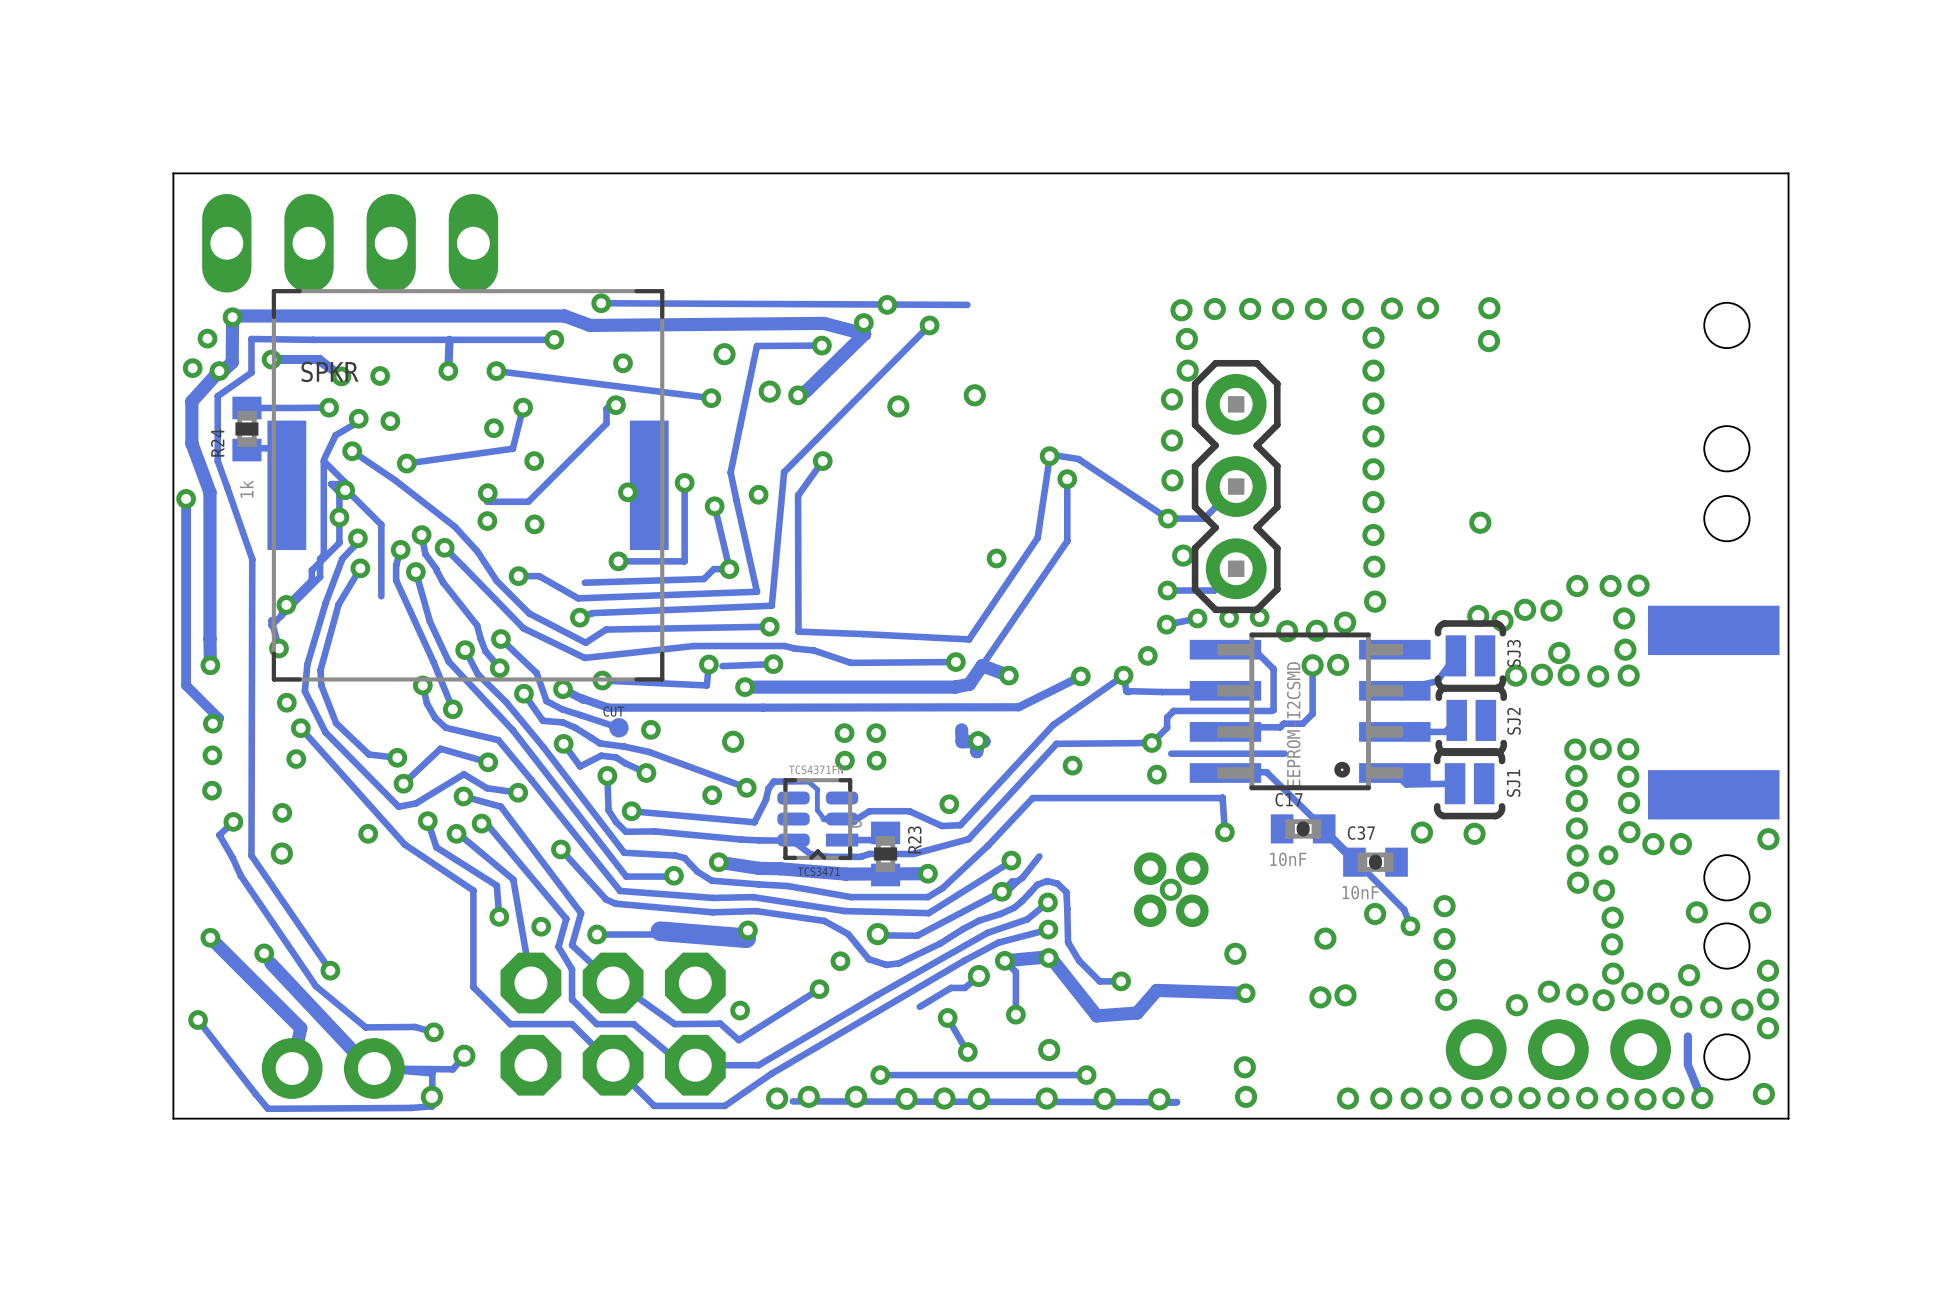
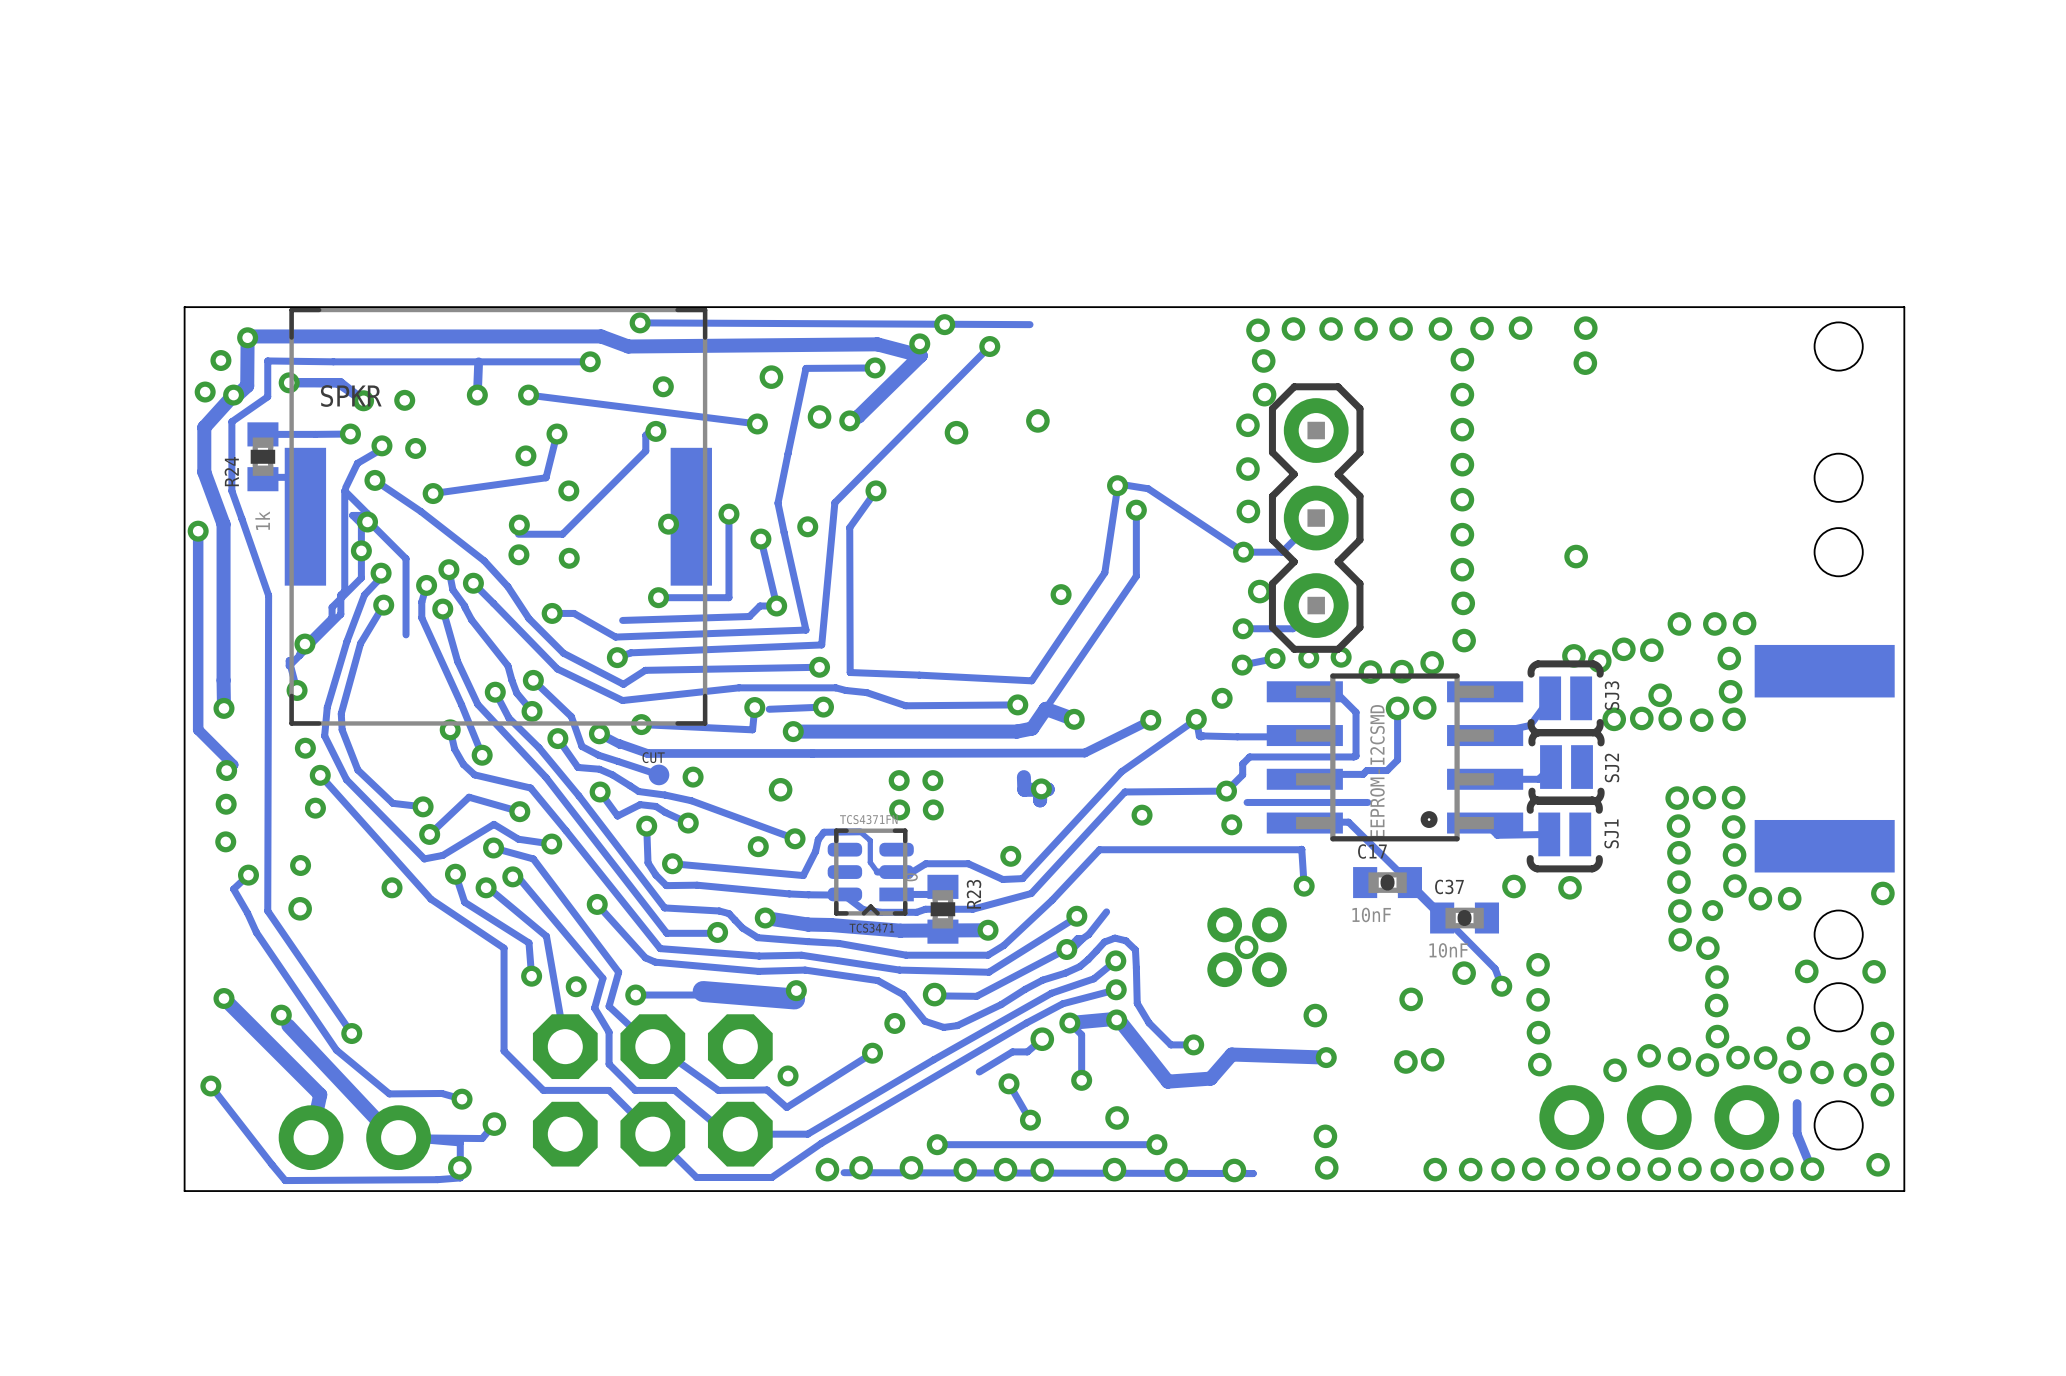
part: (350, 243) -> none
board edge: (1788, 288) (1788, 173) (173, 173) (173, 288) -> (1904, 307) (184, 307)

